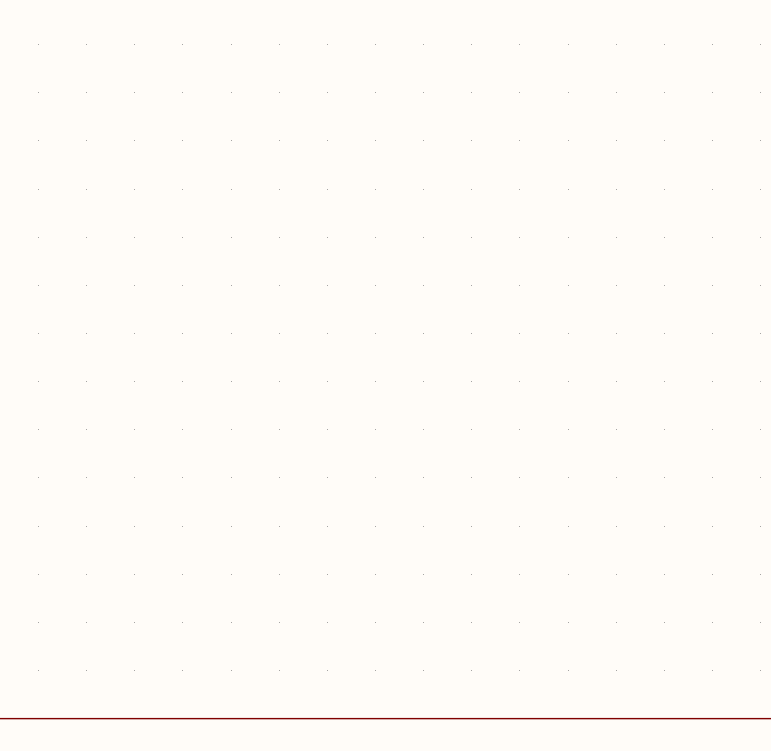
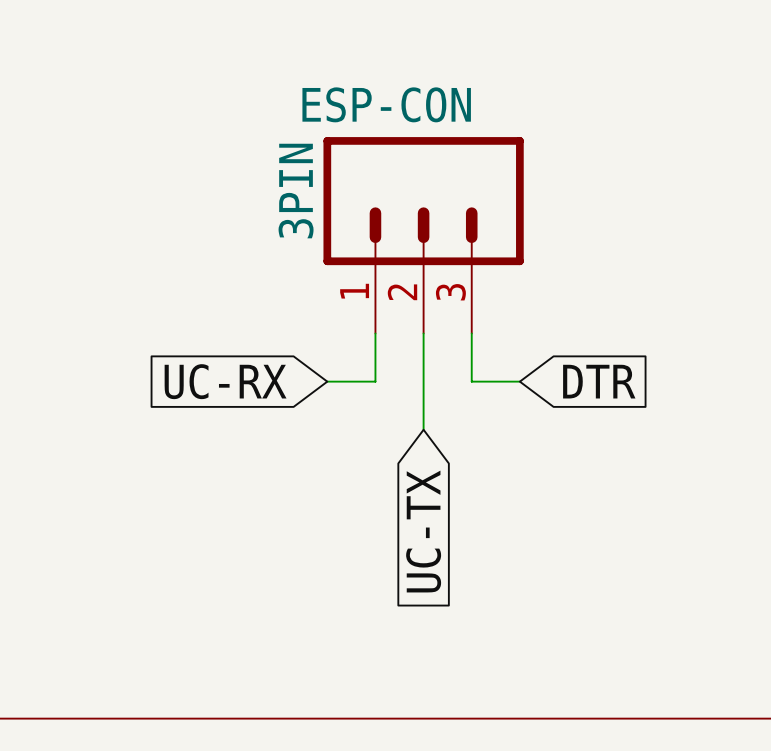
ESP-CON: none -> 3PIN (423, 235)
wire: none -> (375, 333) (375, 381) (327, 381)
wire: none -> (423, 333) (423, 429)
wire: none -> (471, 333) (471, 381) (519, 381)
global label: none -> UC-RX (225, 381)
global label: none -> DTR (599, 381)
global label: none -> UC-TX (423, 531)

